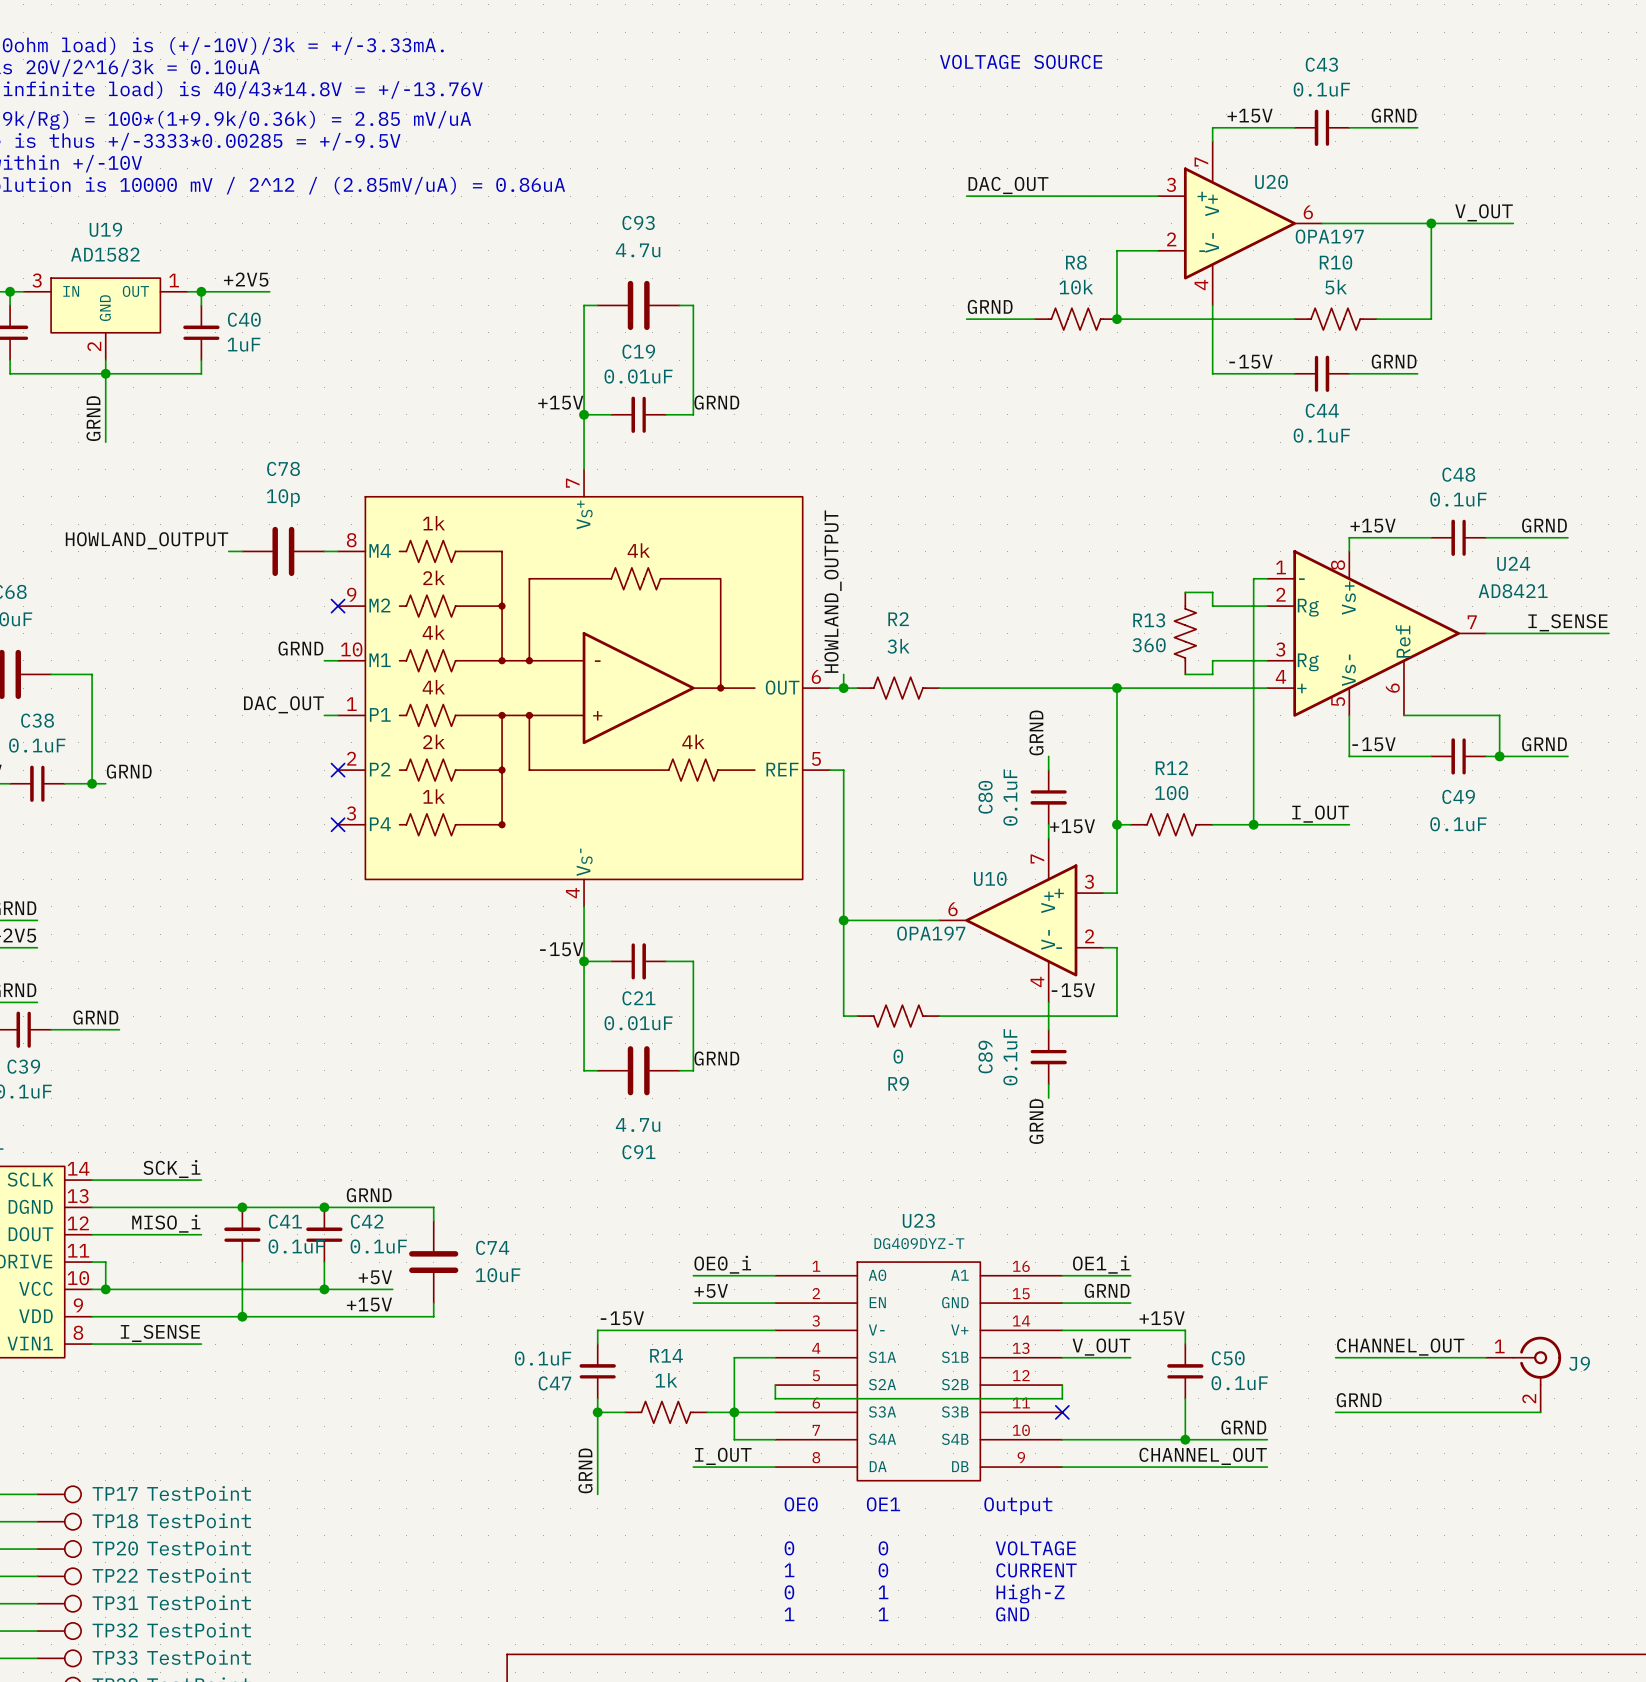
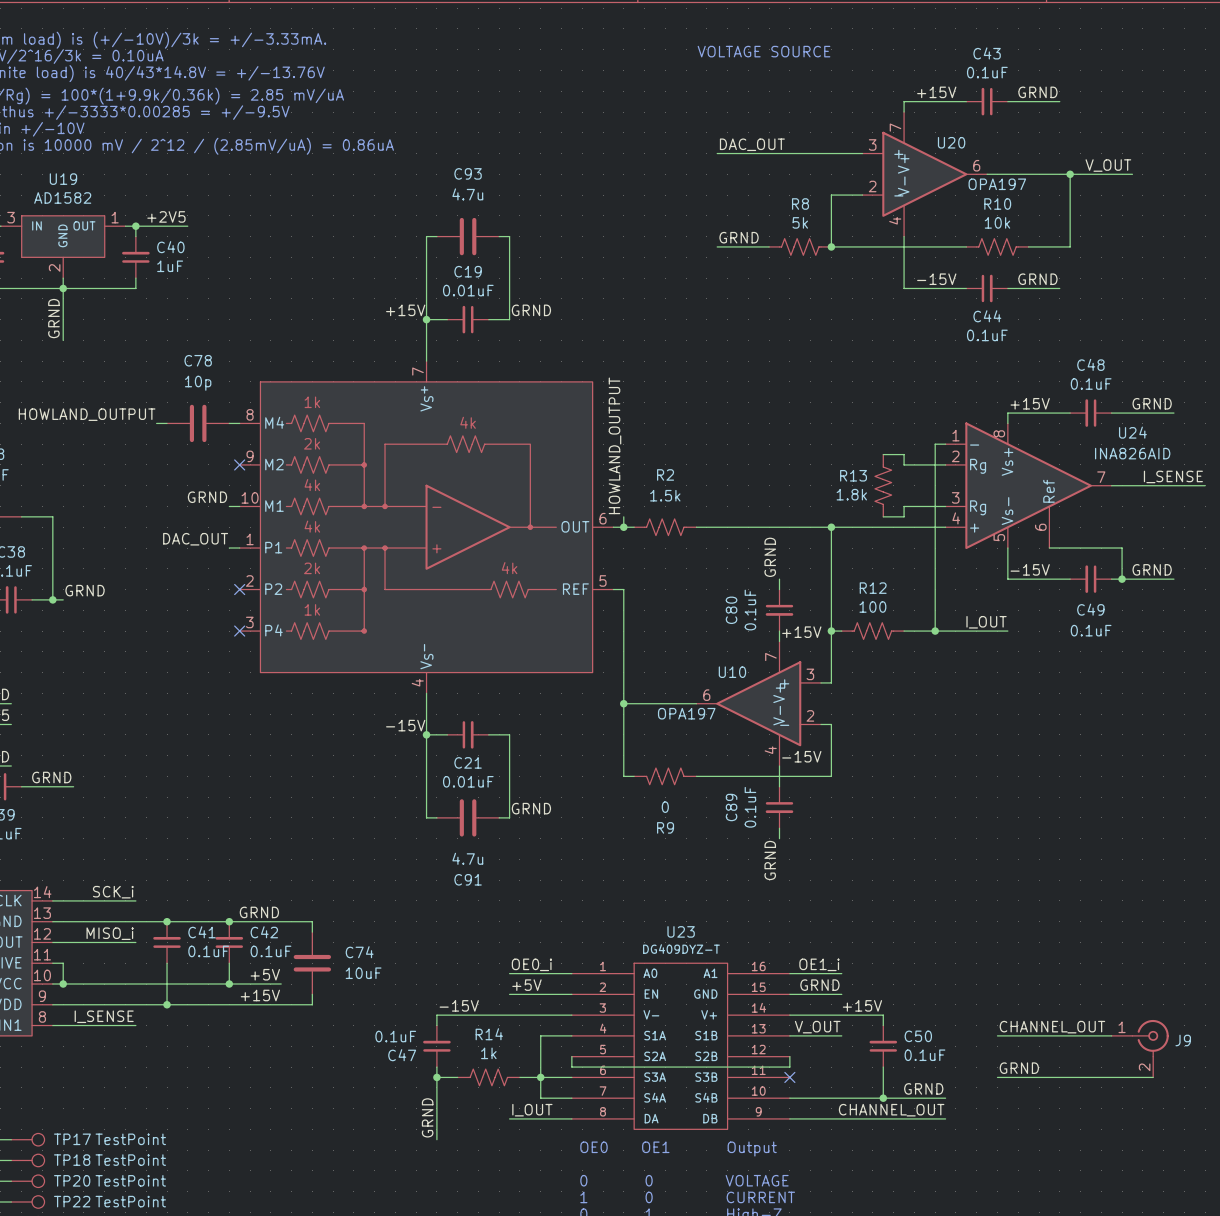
R8 value: 10k (1076, 287) -> 5k (800, 222)
R10 value: 5k (1336, 287) -> 10k (997, 222)
U24 value: AD8421 (1513, 591) -> INA826AID (1132, 453)
R13 value: 360 (1149, 645) -> 1.8k (851, 494)
R2 value: 3k (898, 646) -> 1.5k (665, 495)

